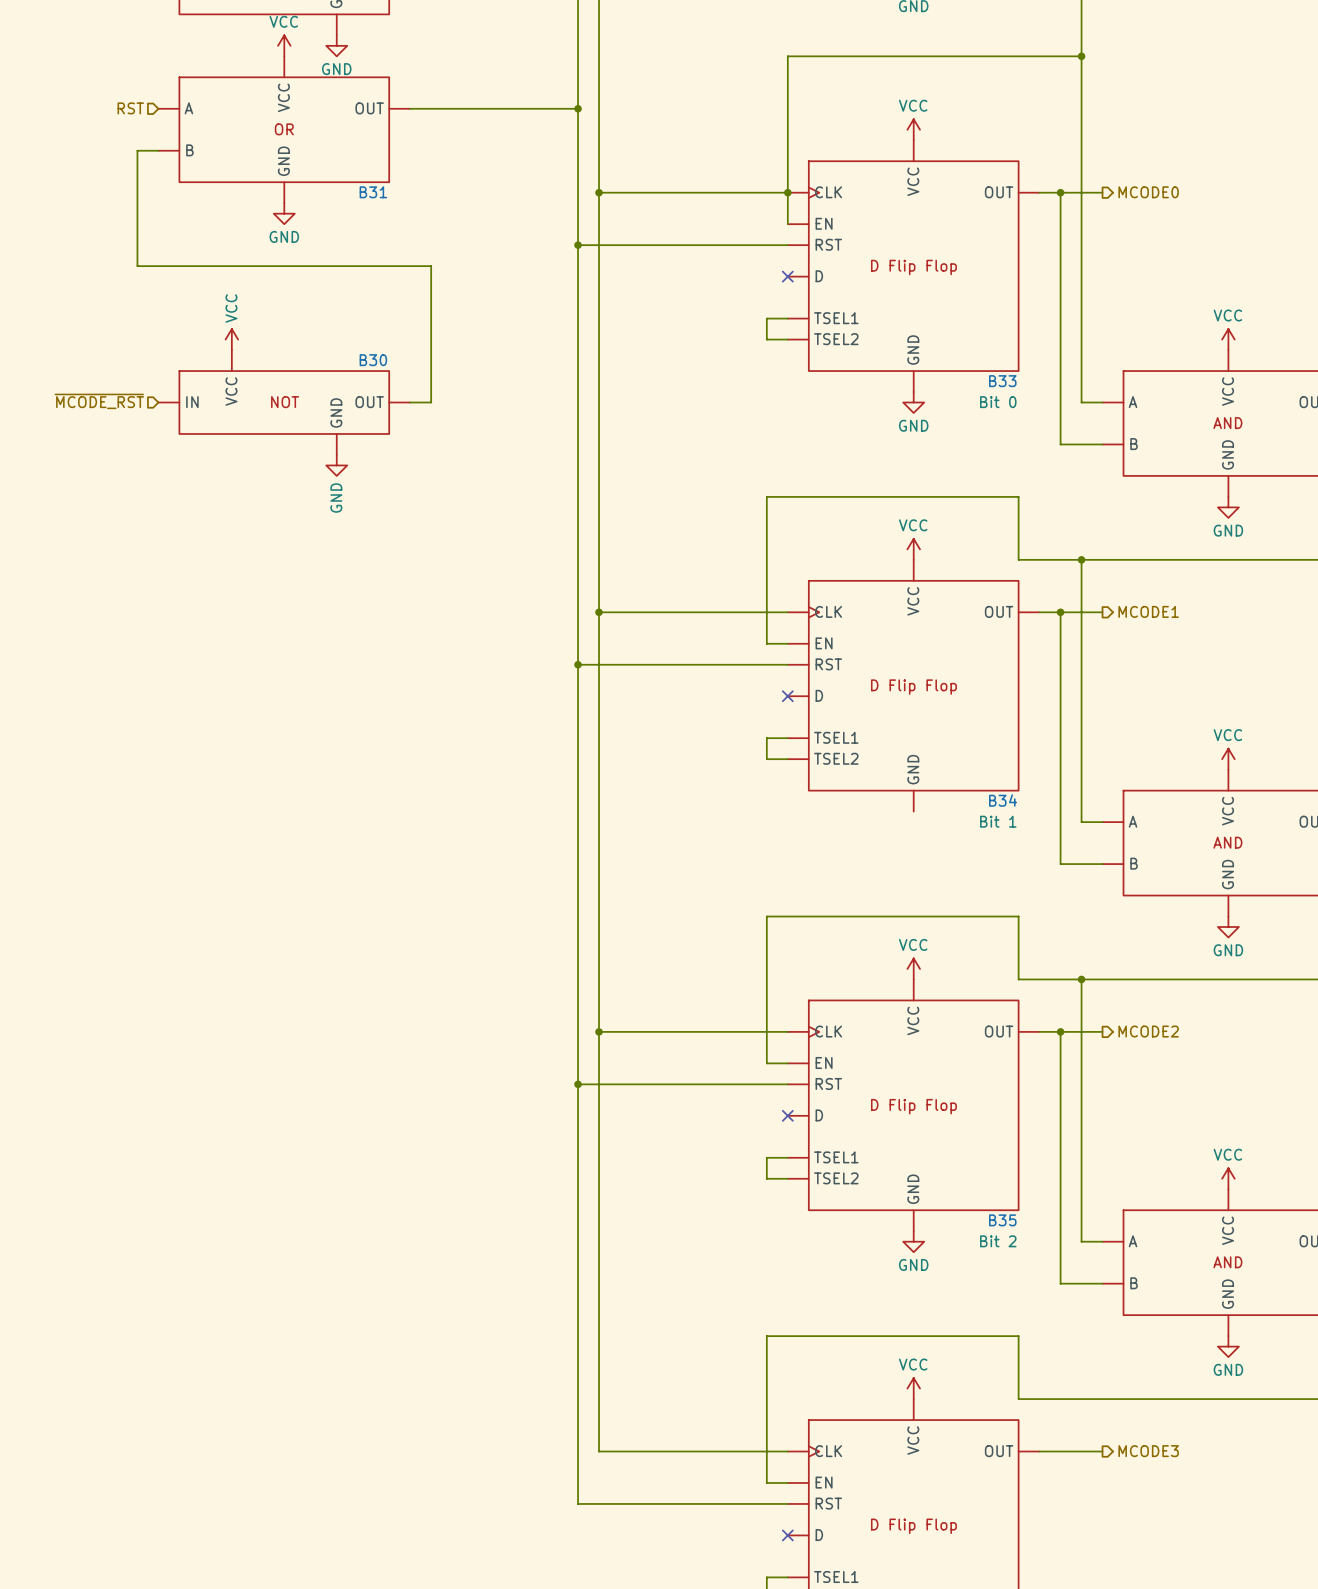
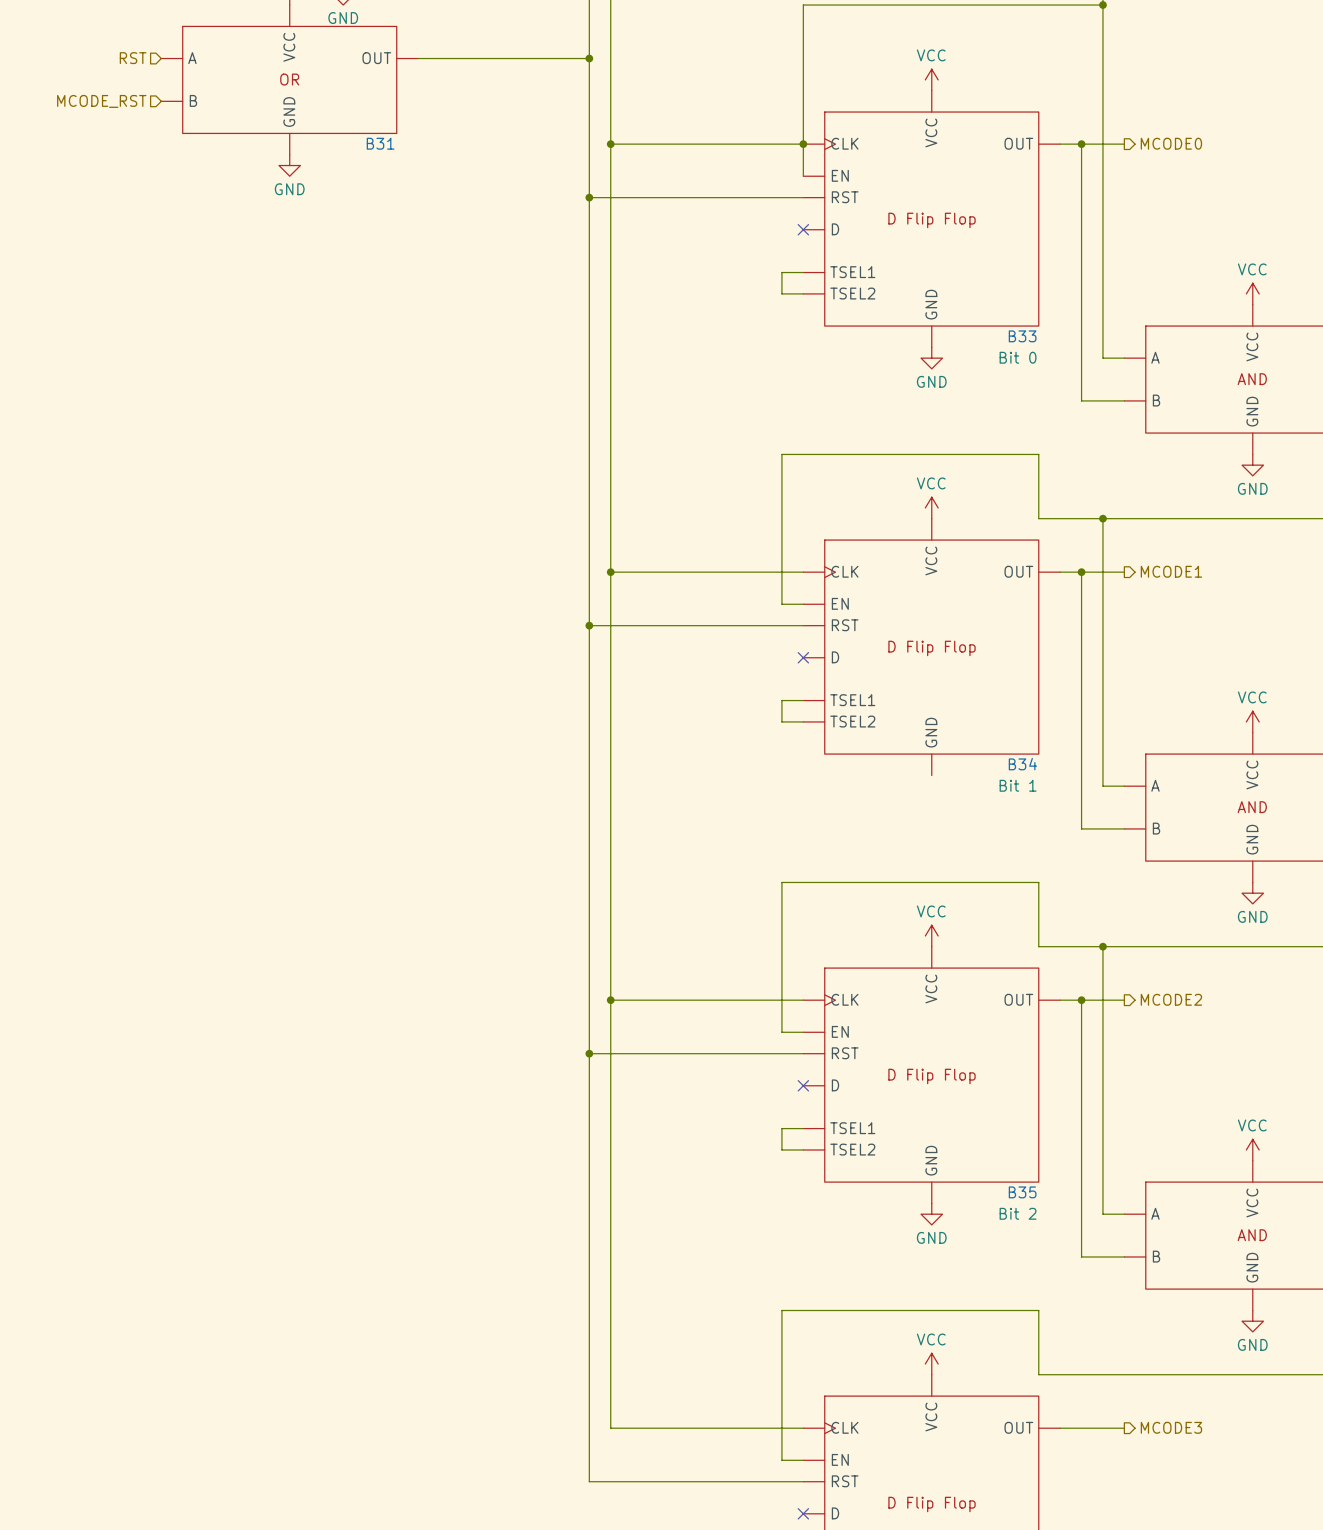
hierarchical label: none -> MCODE_RST (101, 101)
wire: (158, 150) (137, 150) (137, 266) (431, 266) (431, 402) (410, 402) -> none
power symbol: VCC (231, 339) -> none
hierarchical label: ~{MCODE_RST} (99, 401) -> none
B30: (284, 402) -> none
power symbol: GND (336, 465) -> none

